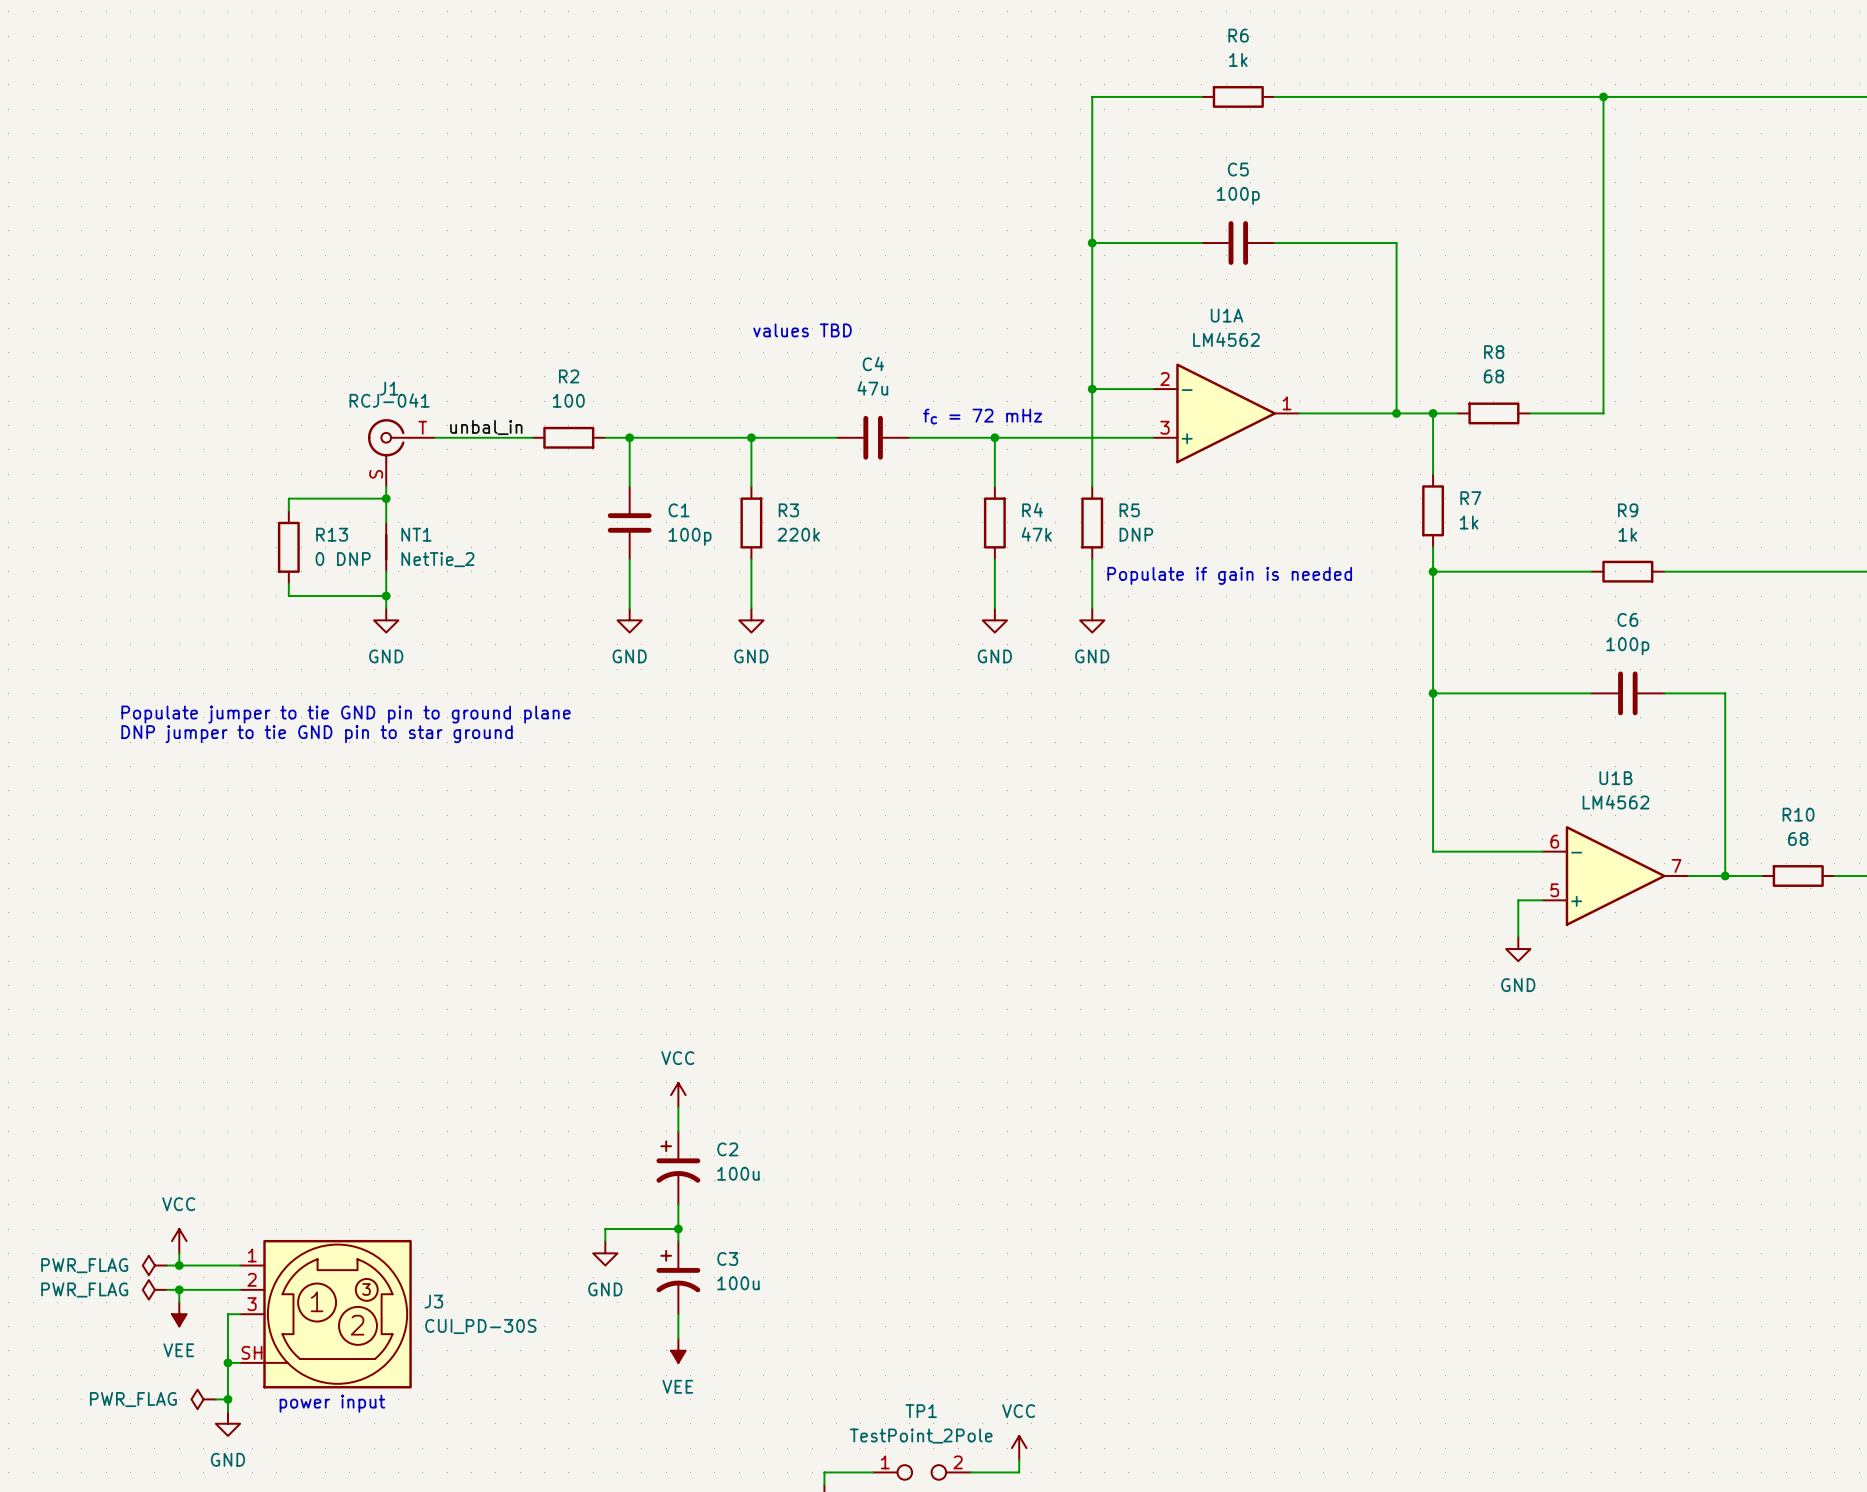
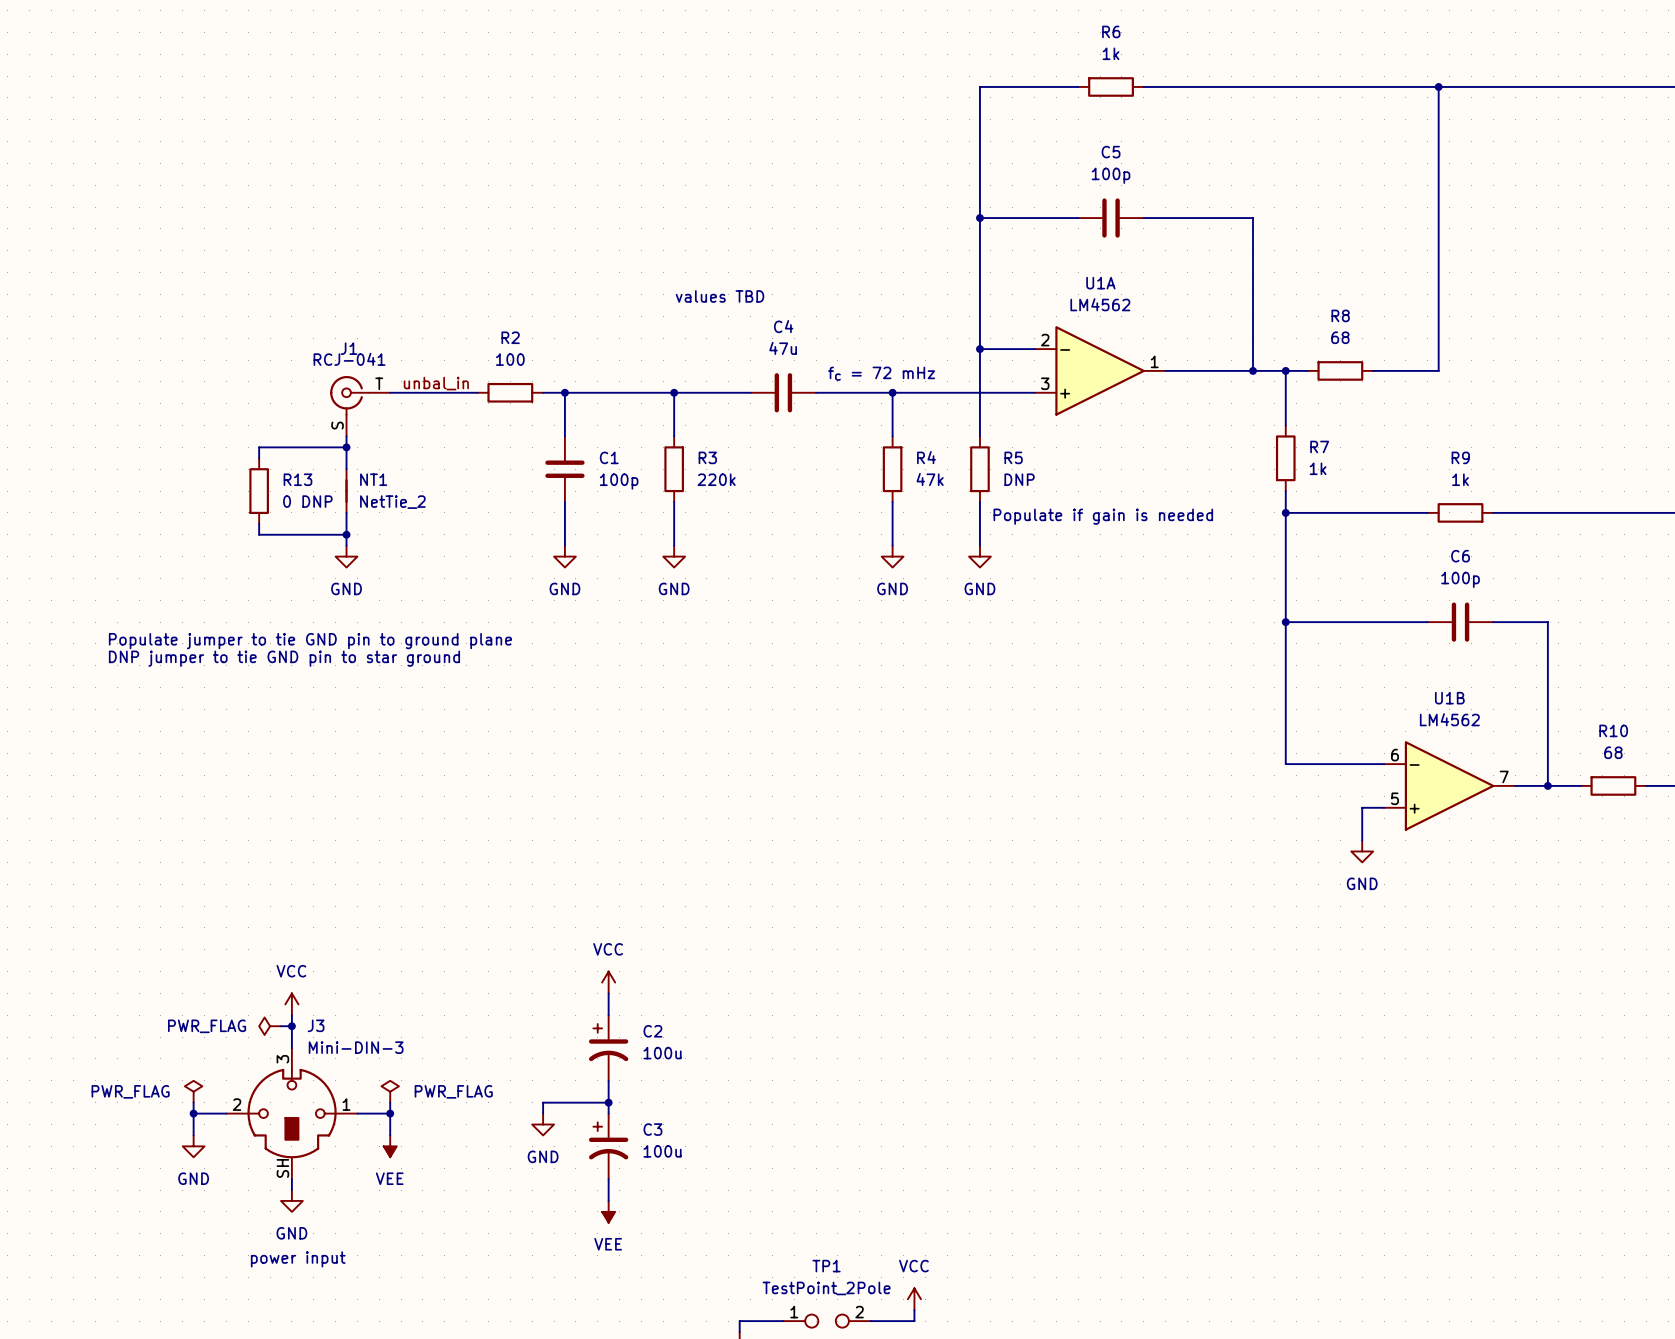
wire: none -> (291, 1015) (291, 1048)
power symbol: none -> PWR_FLAG (270, 1026)
junction: none -> (291, 1026)
power symbol: none -> PWR_FLAG (193, 1091)
power symbol: none -> PWR_FLAG (390, 1091)
wire: none -> (193, 1102) (193, 1135)
wire: none -> (390, 1102) (390, 1135)
J3 symbol: [240, 1239, 412, 1389] -> [226, 1048, 358, 1180]
power symbol position: VCC (179, 1241) -> VCC (291, 1004)
wire: none -> (193, 1113) (226, 1113)
junction: none -> (193, 1113)
wire: none -> (357, 1113) (390, 1113)
junction: none -> (390, 1113)
wire: (179, 1253) (179, 1265) -> none
power symbol: PWR_FLAG (154, 1265) -> none
wire: (167, 1265) (240, 1265) -> none
junction: (179, 1265) -> none
power symbol: none -> GND (193, 1146)
power symbol: none -> VEE (390, 1146)
power symbol: PWR_FLAG (154, 1289) -> none
wire: (167, 1289) (240, 1289) -> none
junction: (179, 1289) -> none
J3 name position: J3 (433, 1301) -> J3 (316, 1025)
power symbol: VEE (179, 1314) -> none
wire: (240, 1314) (227, 1314) (227, 1411) -> none
J3 value: CUI_PD-30S (480, 1326) -> Mini-DIN-3 (356, 1047)
power symbol: none -> GND (291, 1200)
wire: (227, 1362) (240, 1362) -> (280, 1026) (291, 1026)
junction: (227, 1362) -> none
power symbol: PWR_FLAG (203, 1399) -> none
wire: (215, 1399) (227, 1399) -> none
junction: (227, 1399) -> none
power symbol: GND (227, 1423) -> none

